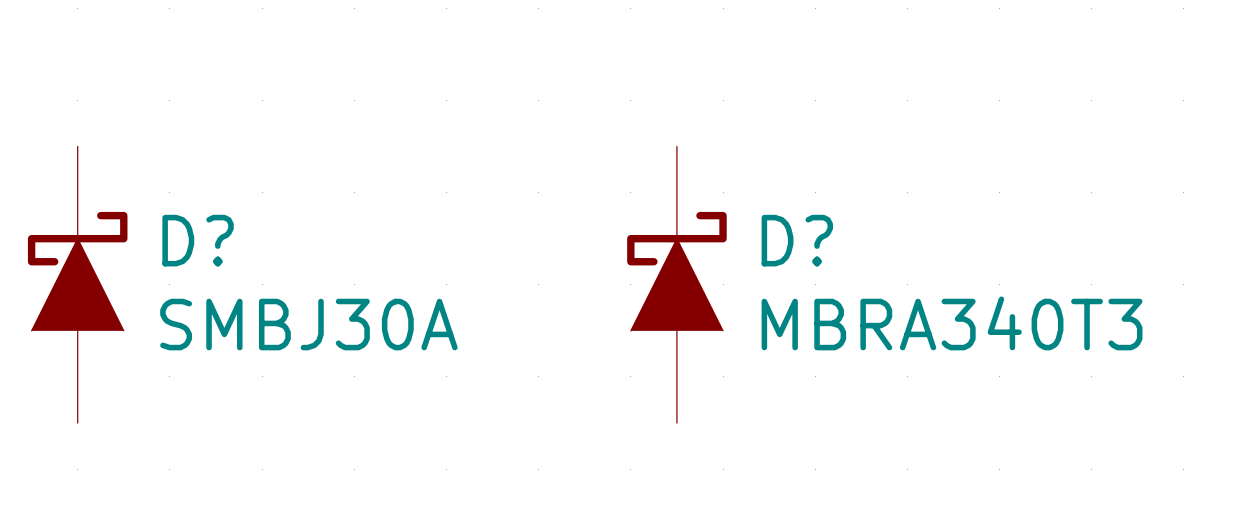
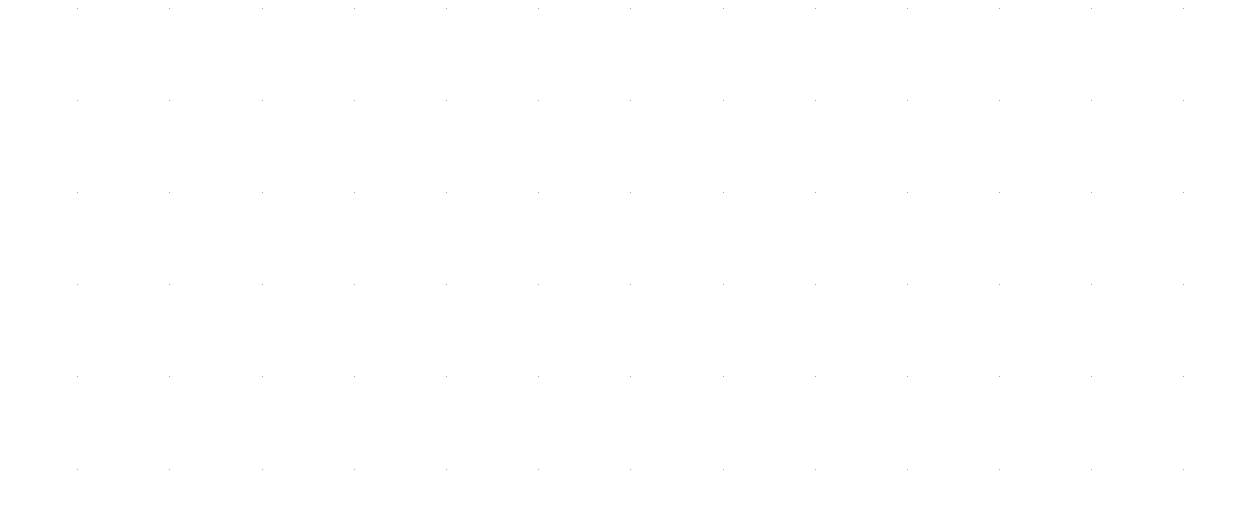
D?: SMBJ30A (77, 284) -> none
D?: MBRA340T3 (676, 284) -> none

